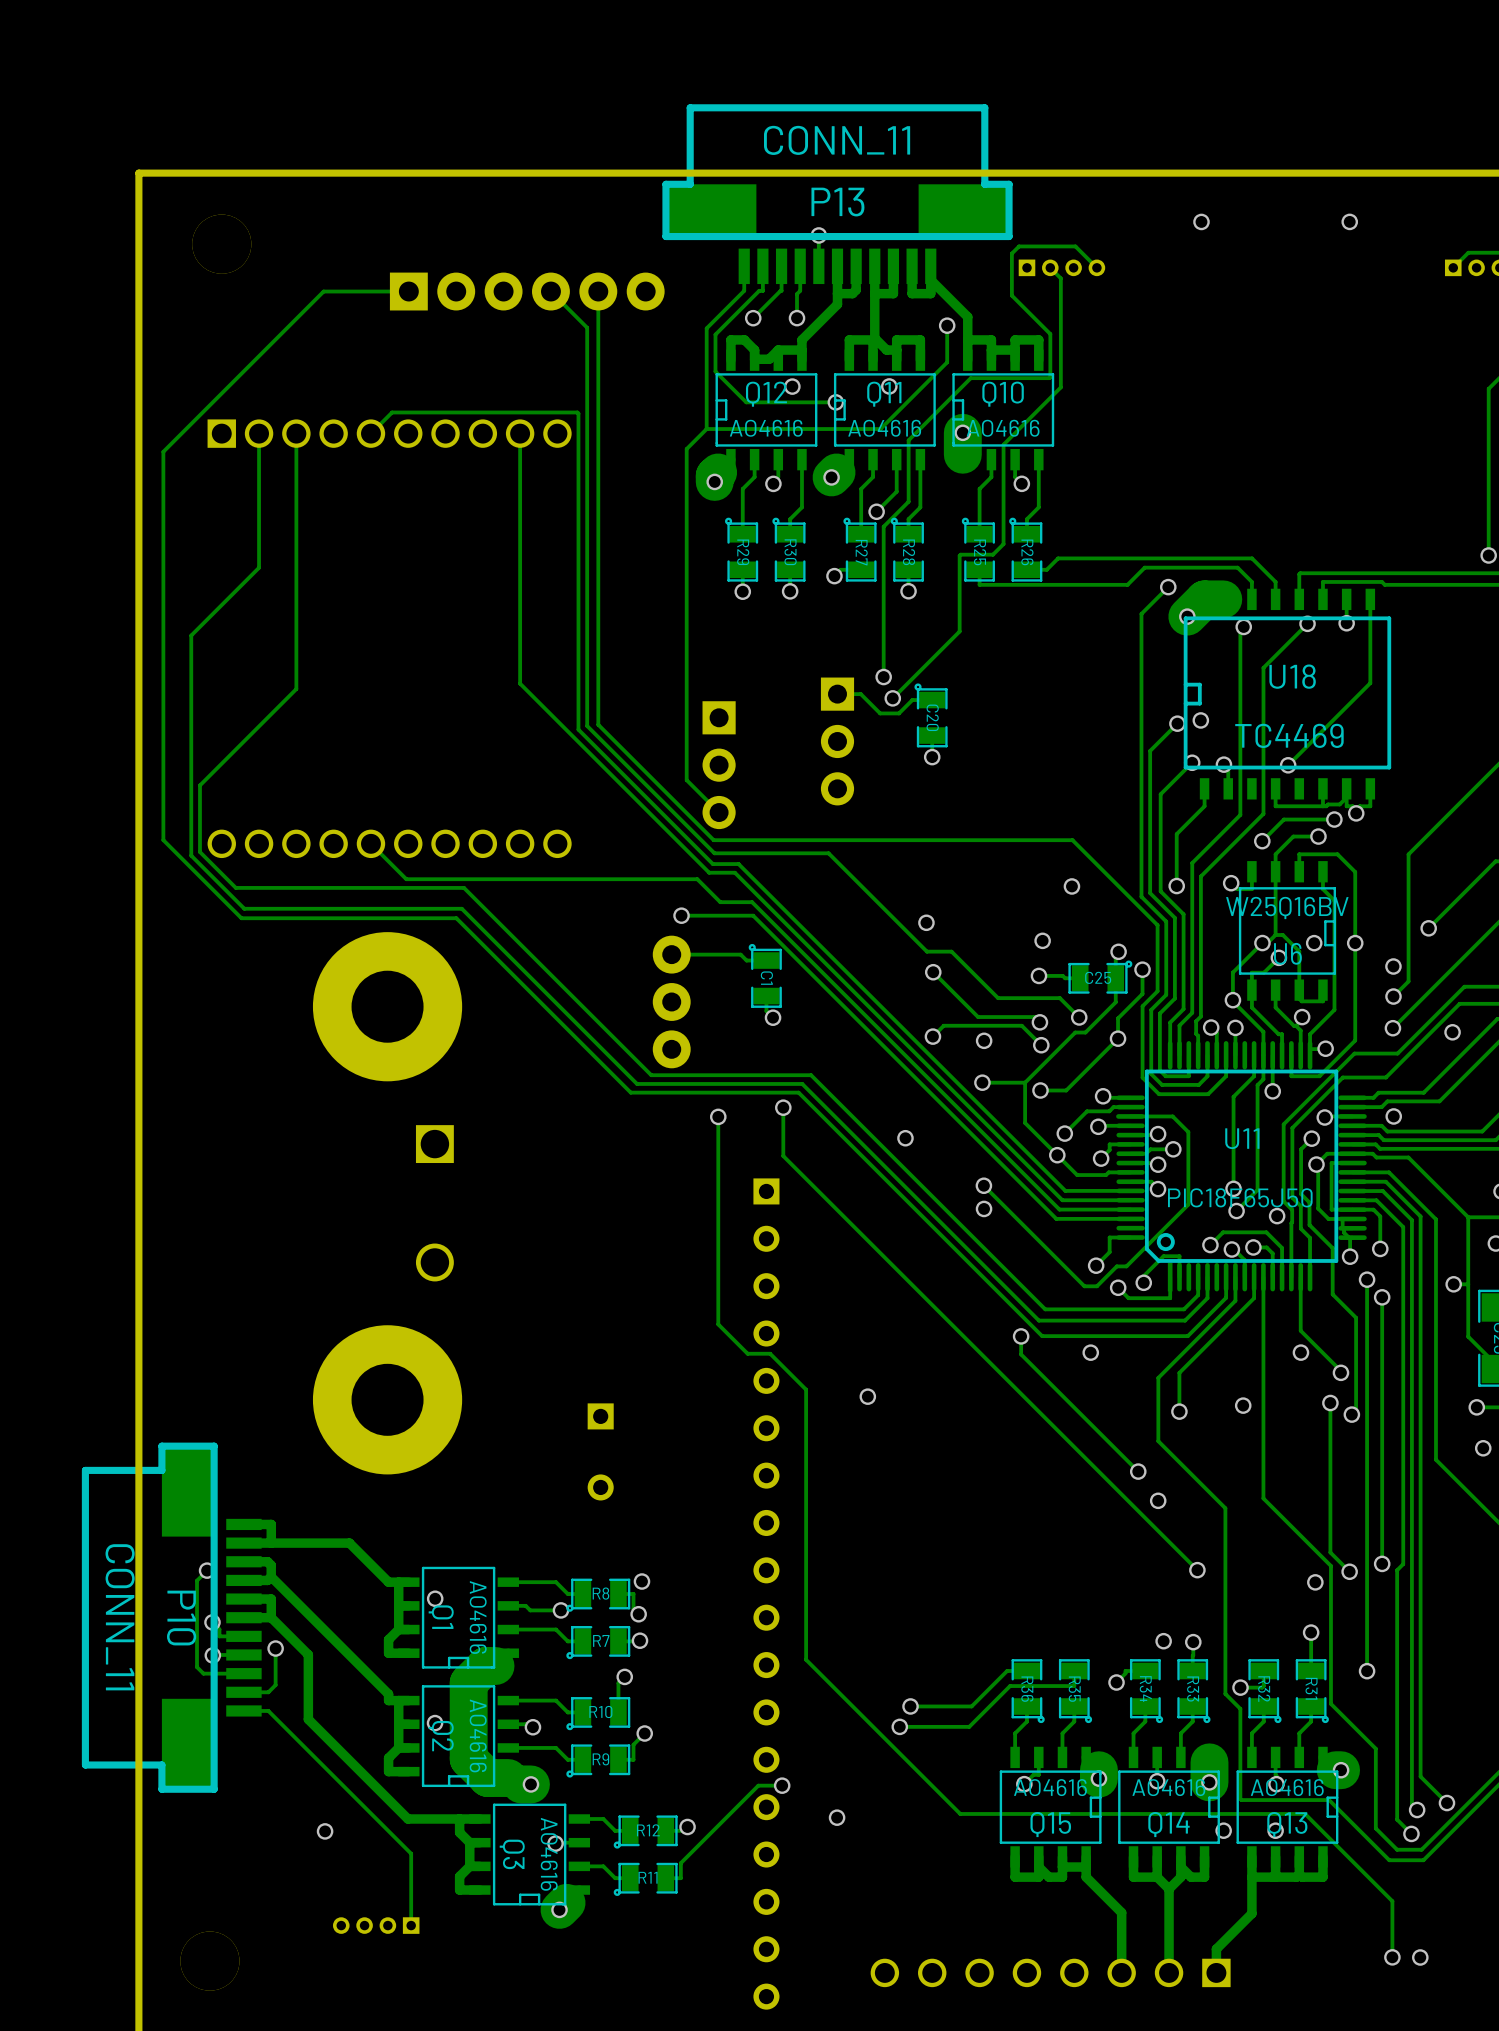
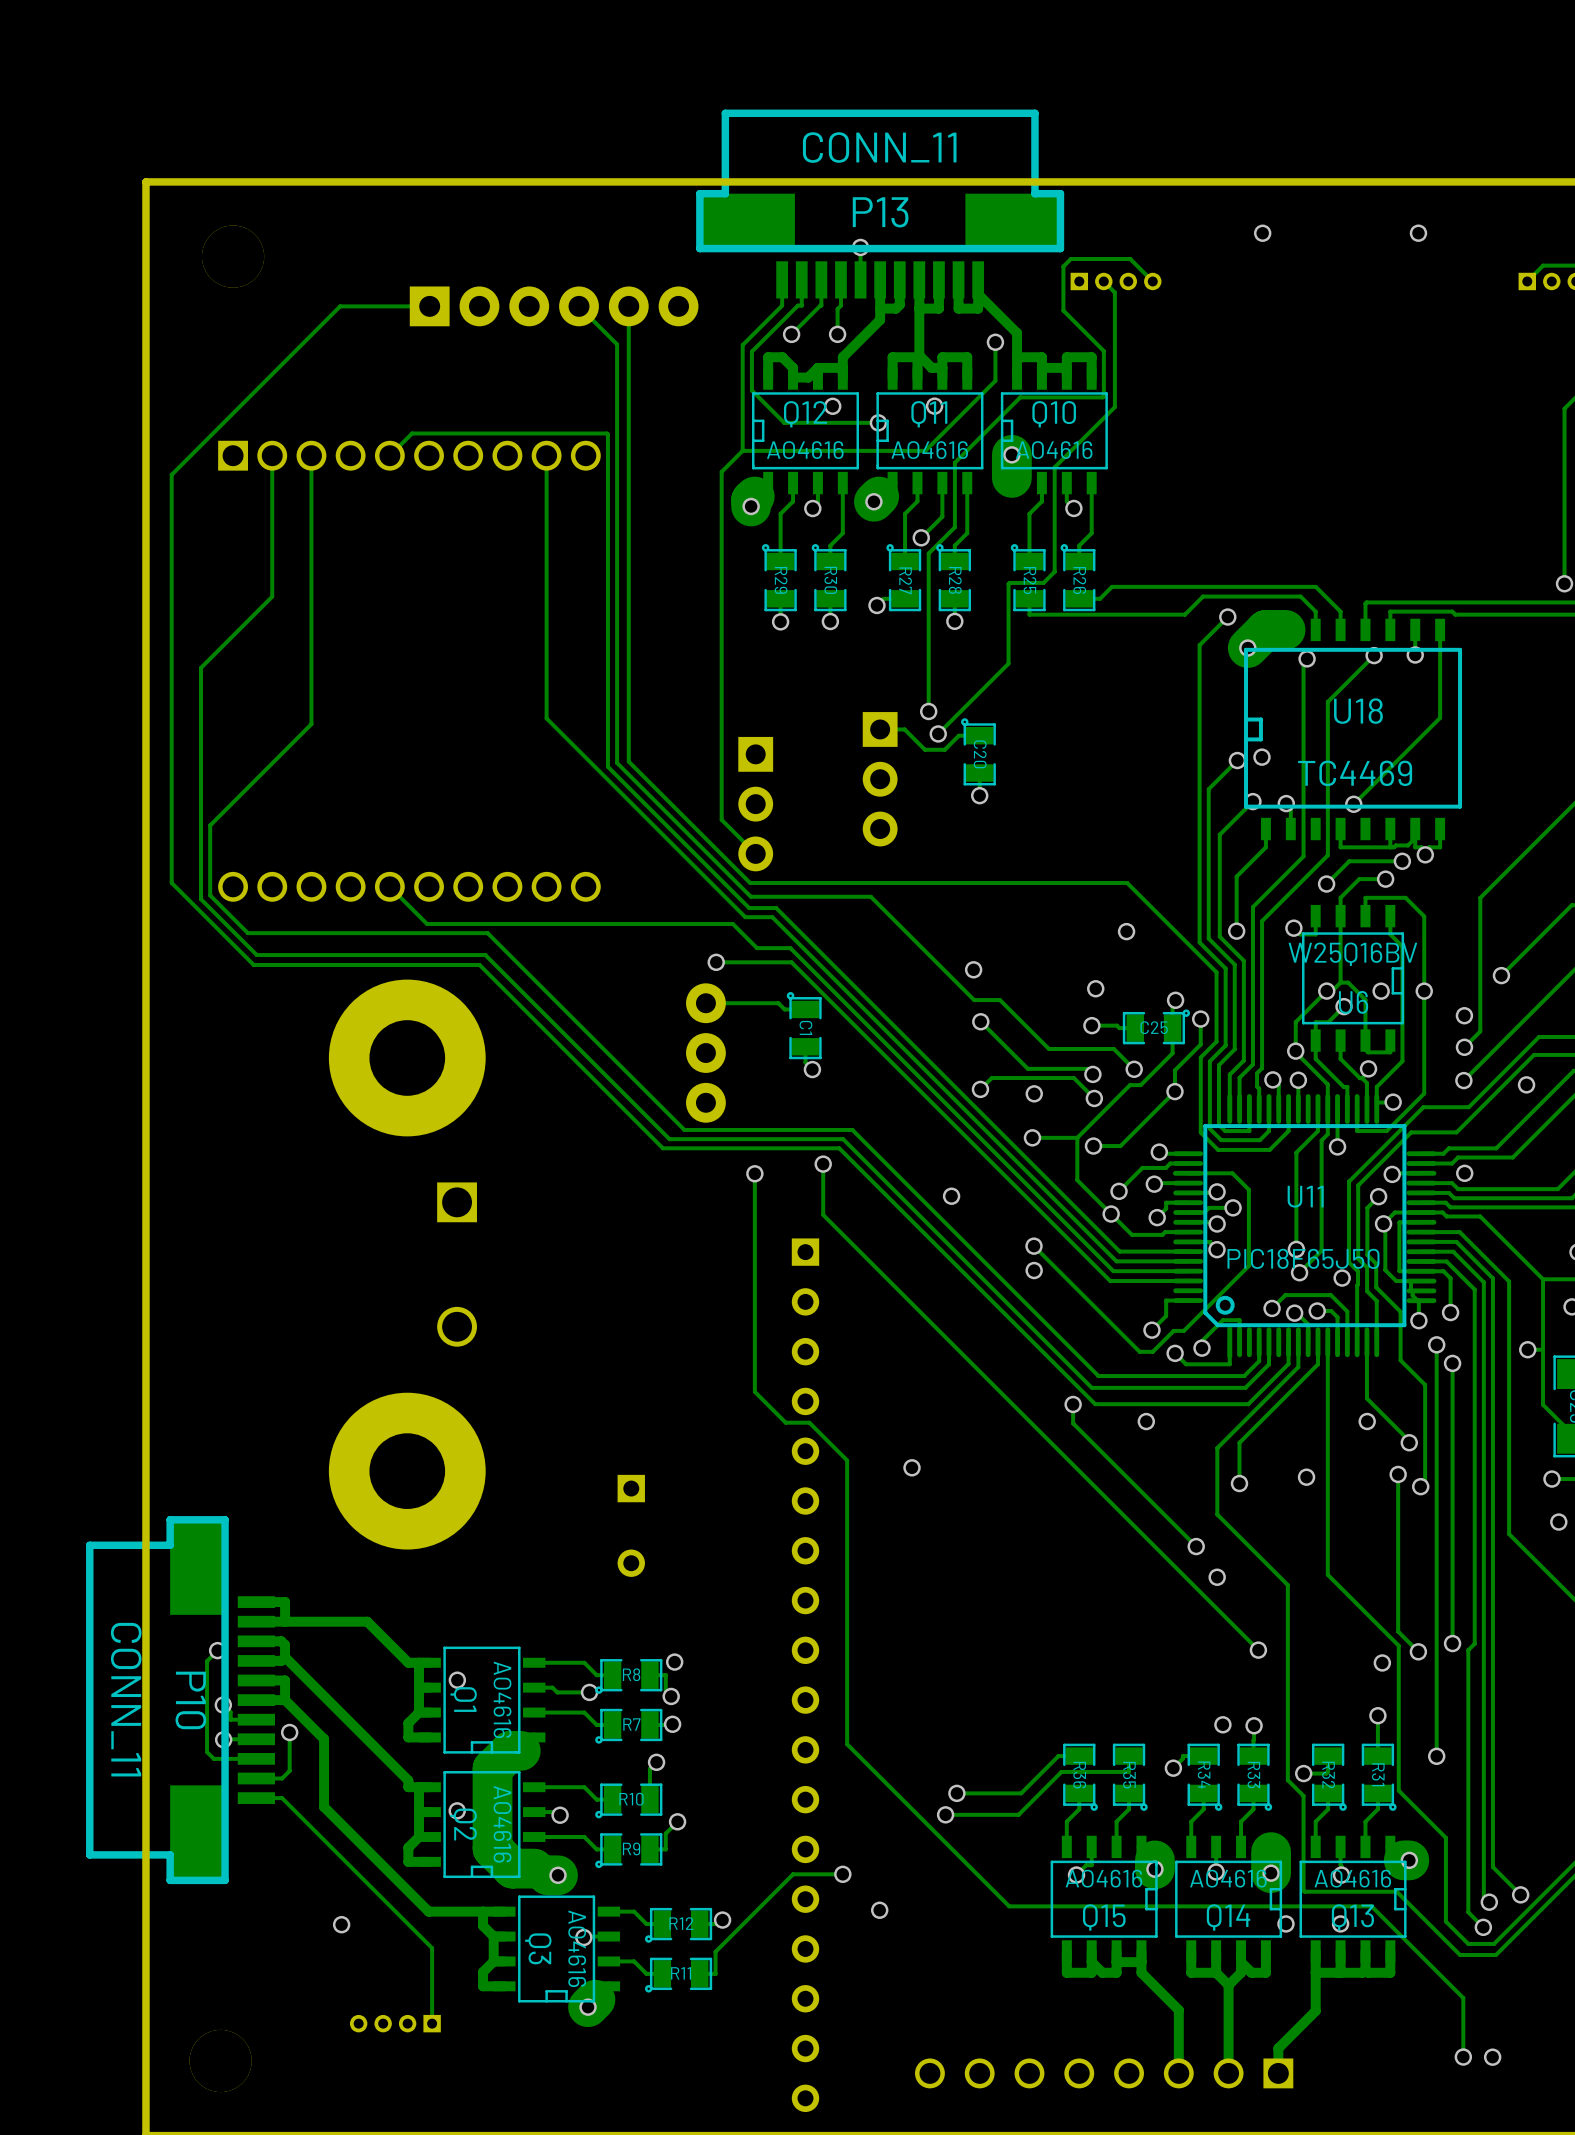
track: (782, 1785) (758, 1785) (680, 1863) -> (842, 1874) (793, 1874) (715, 1951) (715, 1958)
via position: (782, 1785) -> (842, 1874)

